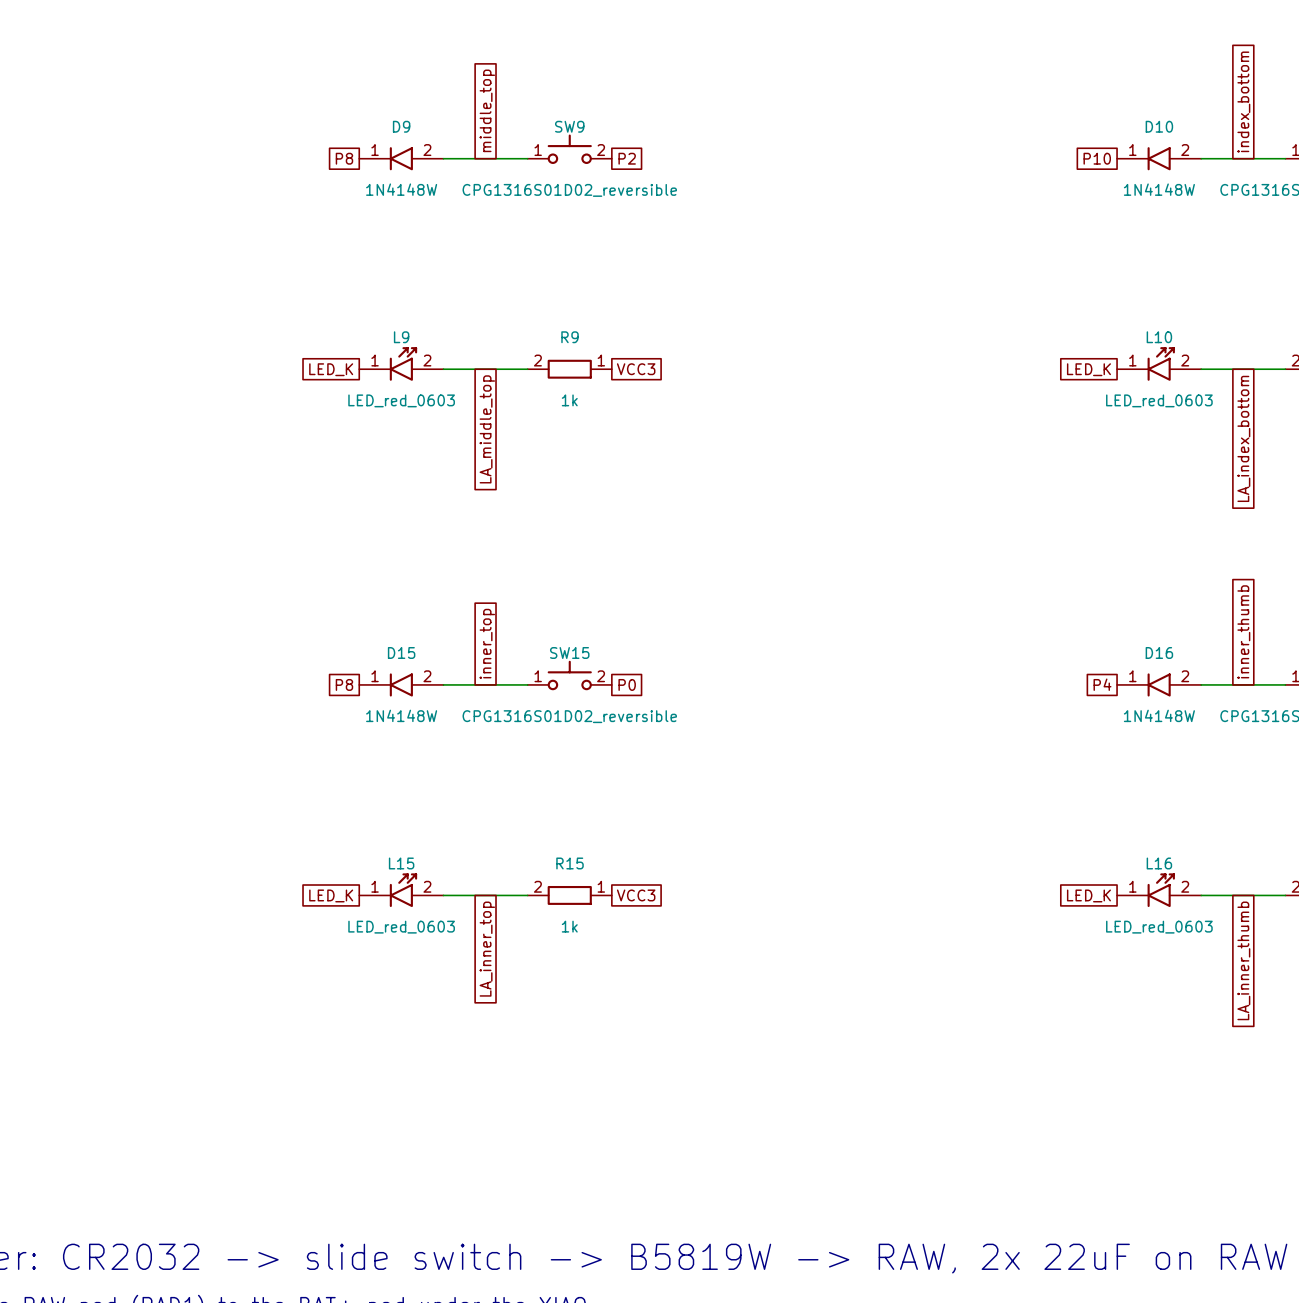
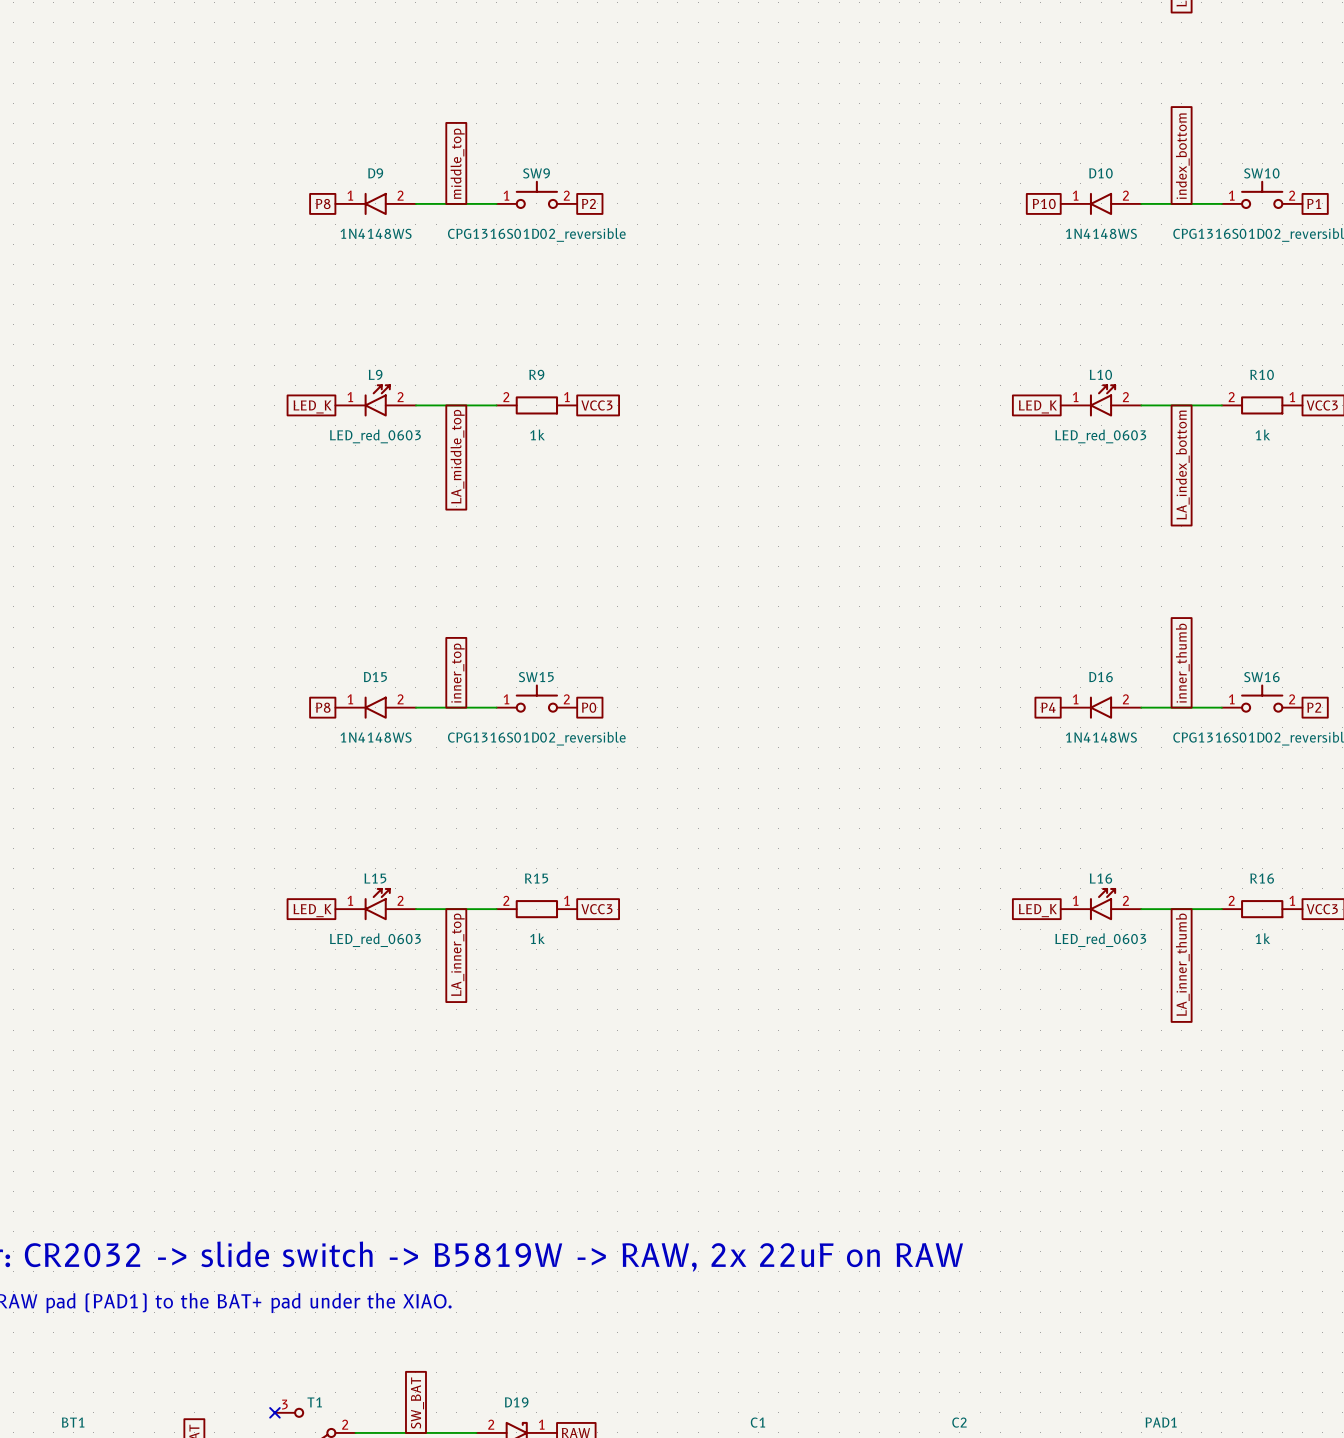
D9 value: 1N4148W (401, 189) -> 1N4148WS (376, 233)
D10 value: 1N4148W (1159, 189) -> 1N4148WS (1101, 233)
D15 value: 1N4148W (401, 715) -> 1N4148WS (376, 737)
D16 value: 1N4148W (1159, 715) -> 1N4148WS (1101, 737)

